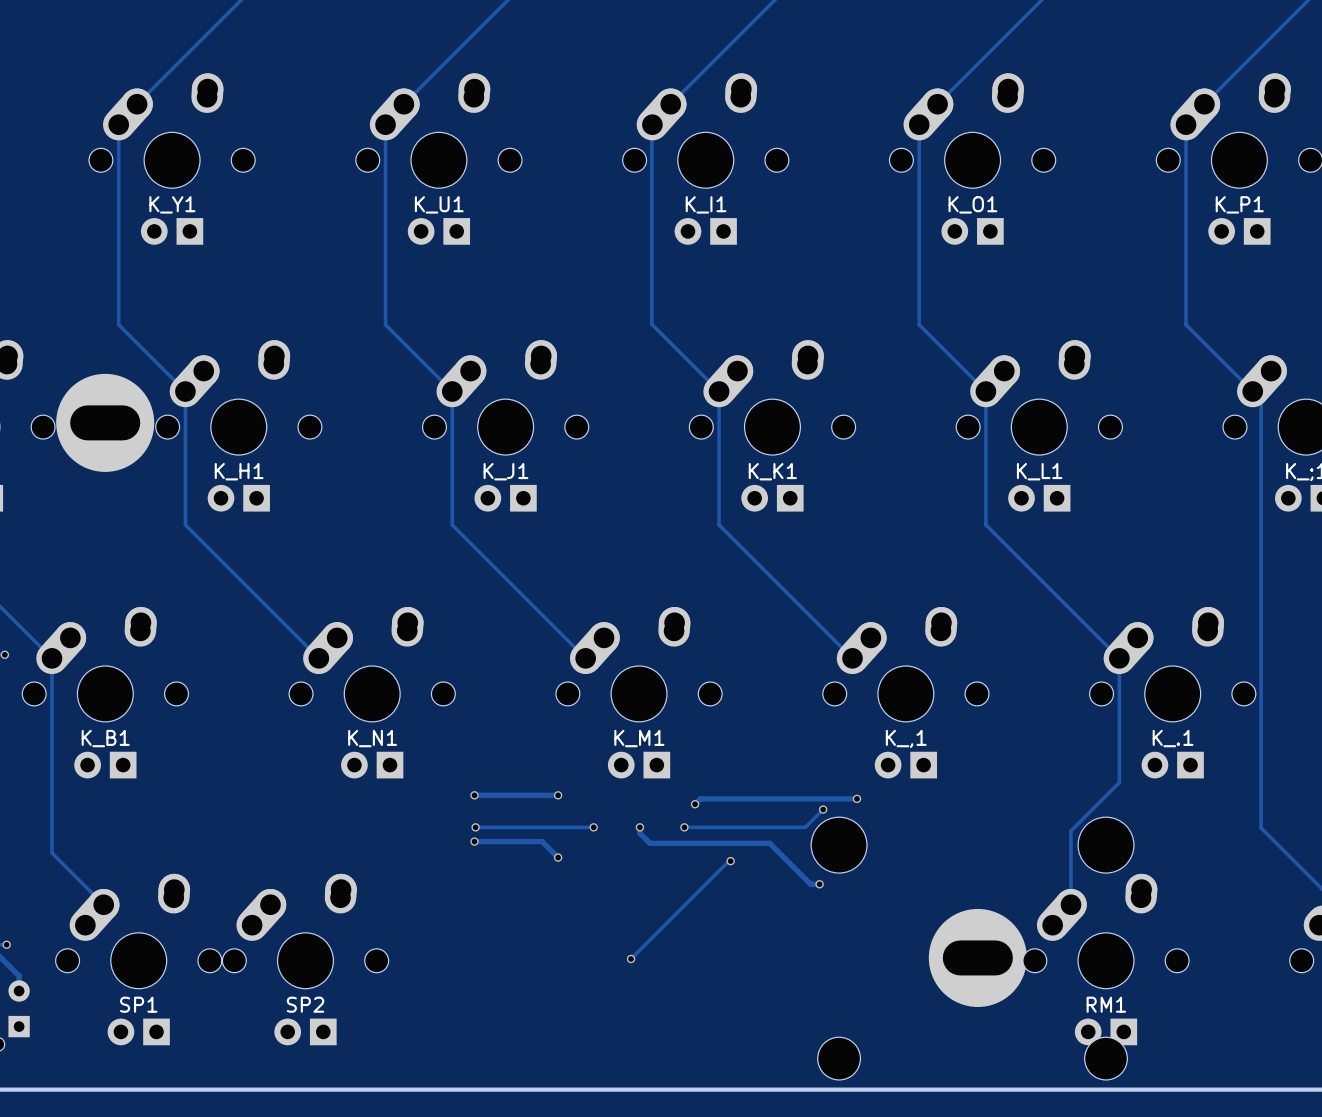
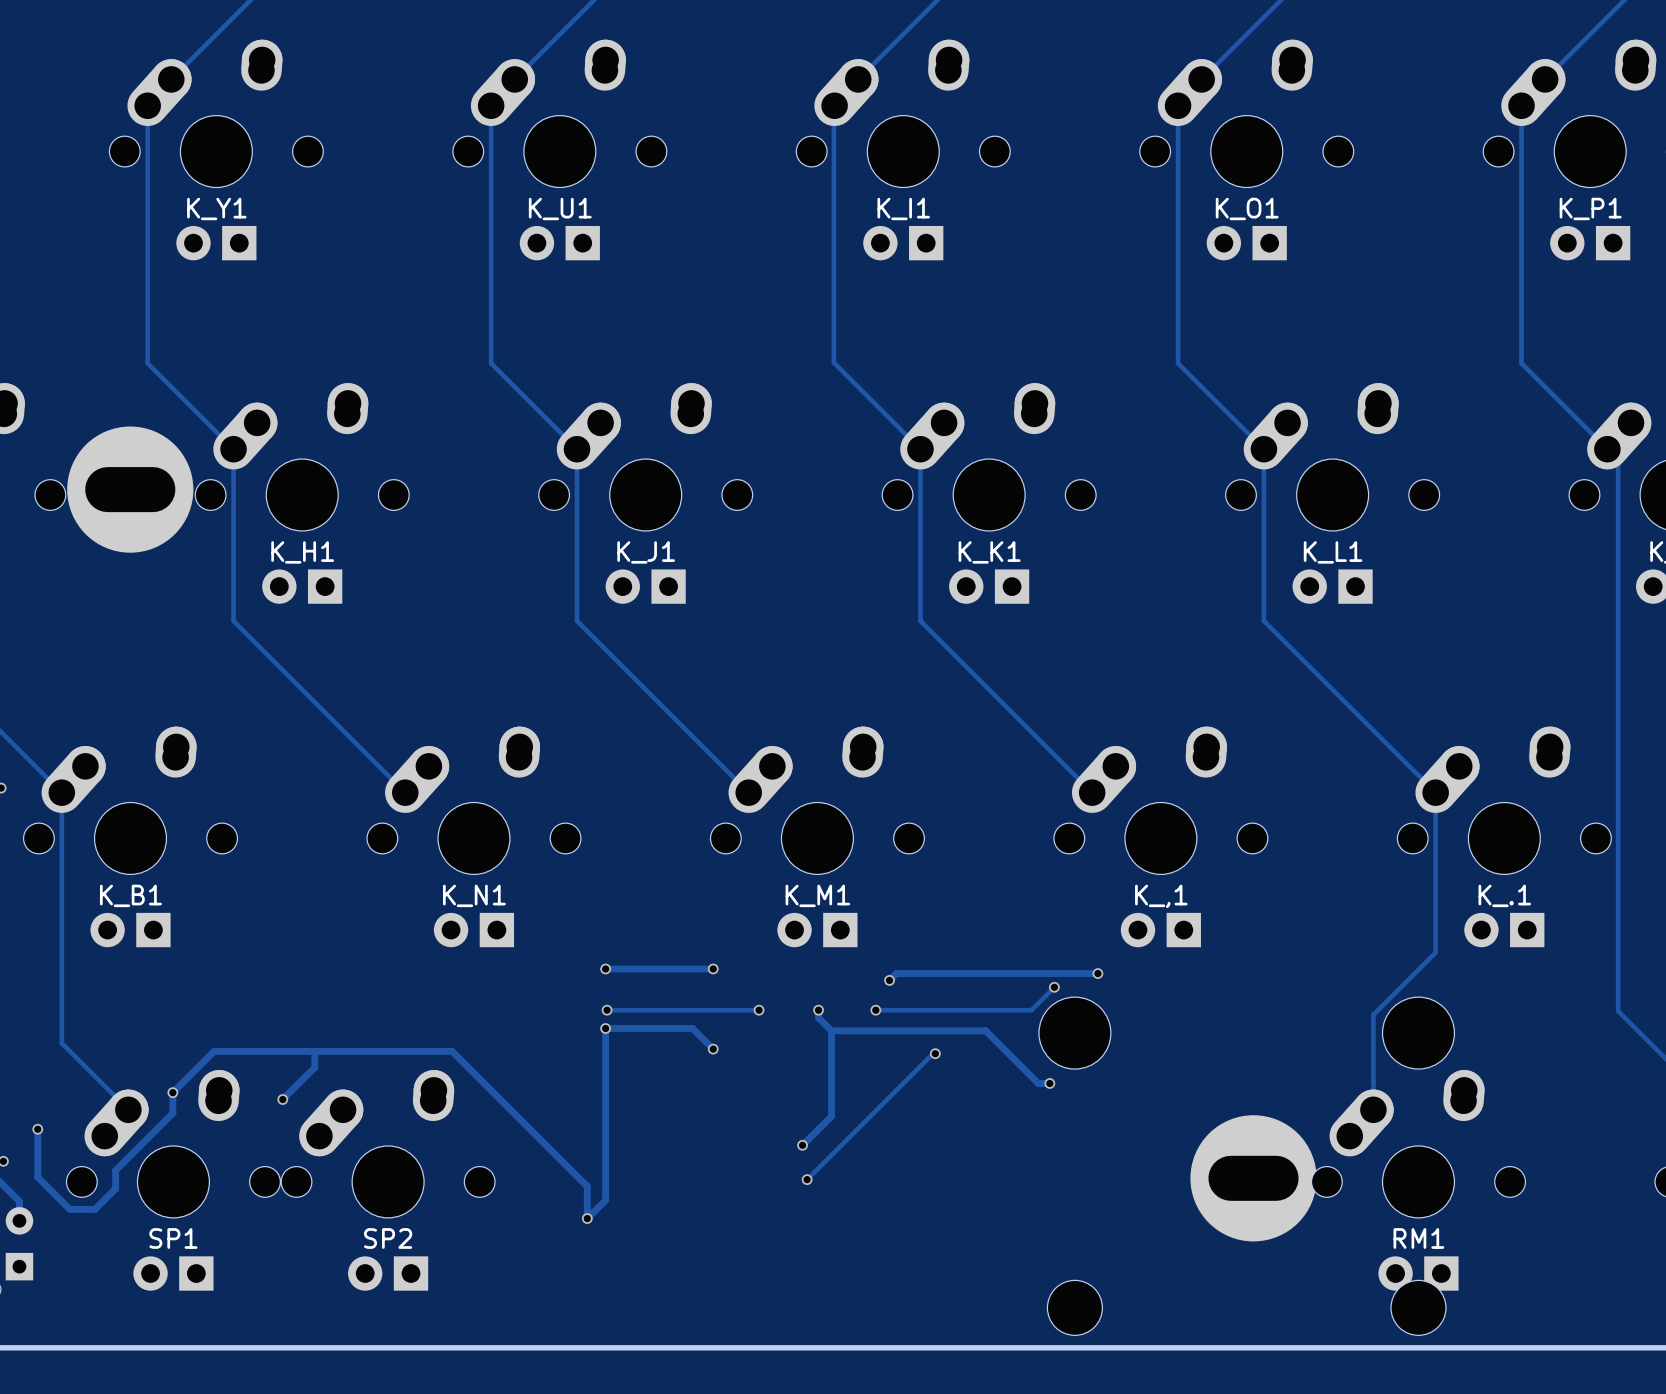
track: none -> (605, 1028) (605, 1200) (587, 1218) (587, 1186) (452, 1051) (214, 1051) (172, 1092) (172, 1113) (115, 1170) (115, 1188) (95, 1209) (69, 1209) (37, 1177) (37, 1129)
track: none -> (831, 1030) (831, 1116) (802, 1145)
track: none -> (314, 1051) (314, 1067) (282, 1099)
via: none -> (172, 1092)
via: none -> (282, 1099)
via: none -> (37, 1129)
via: none -> (802, 1145)
via: none -> (587, 1218)

